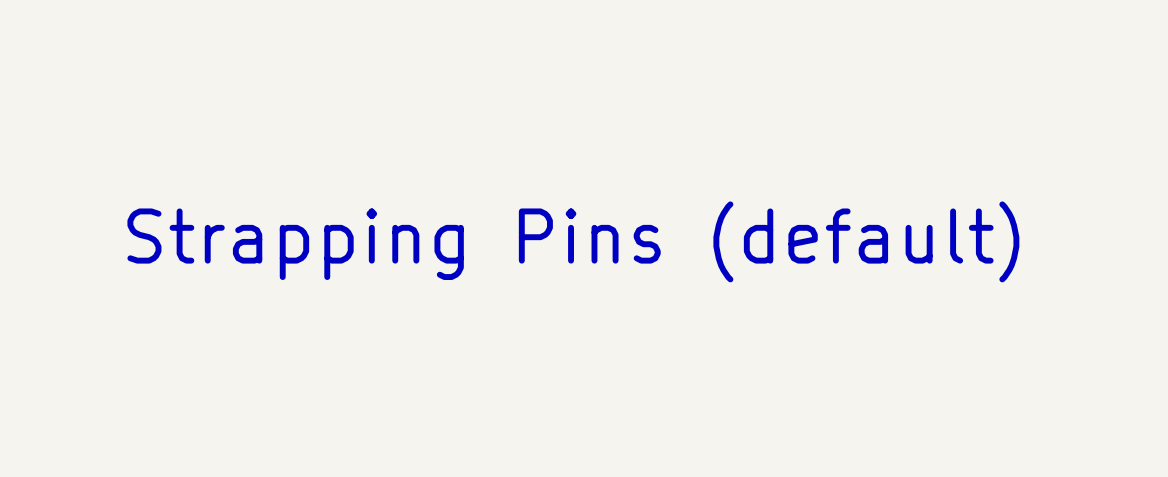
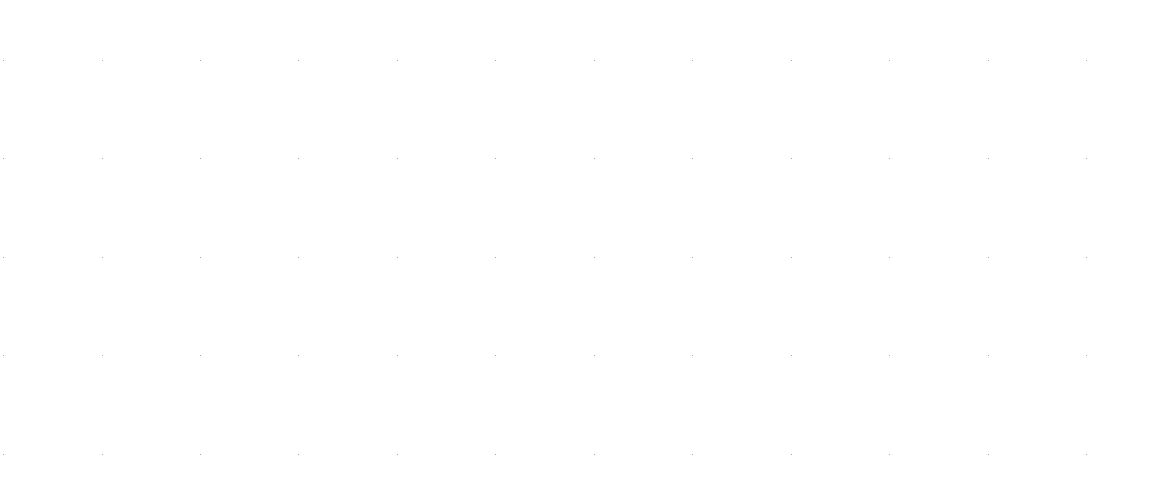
text: Strapping Pins (default) (573, 241) -> none

